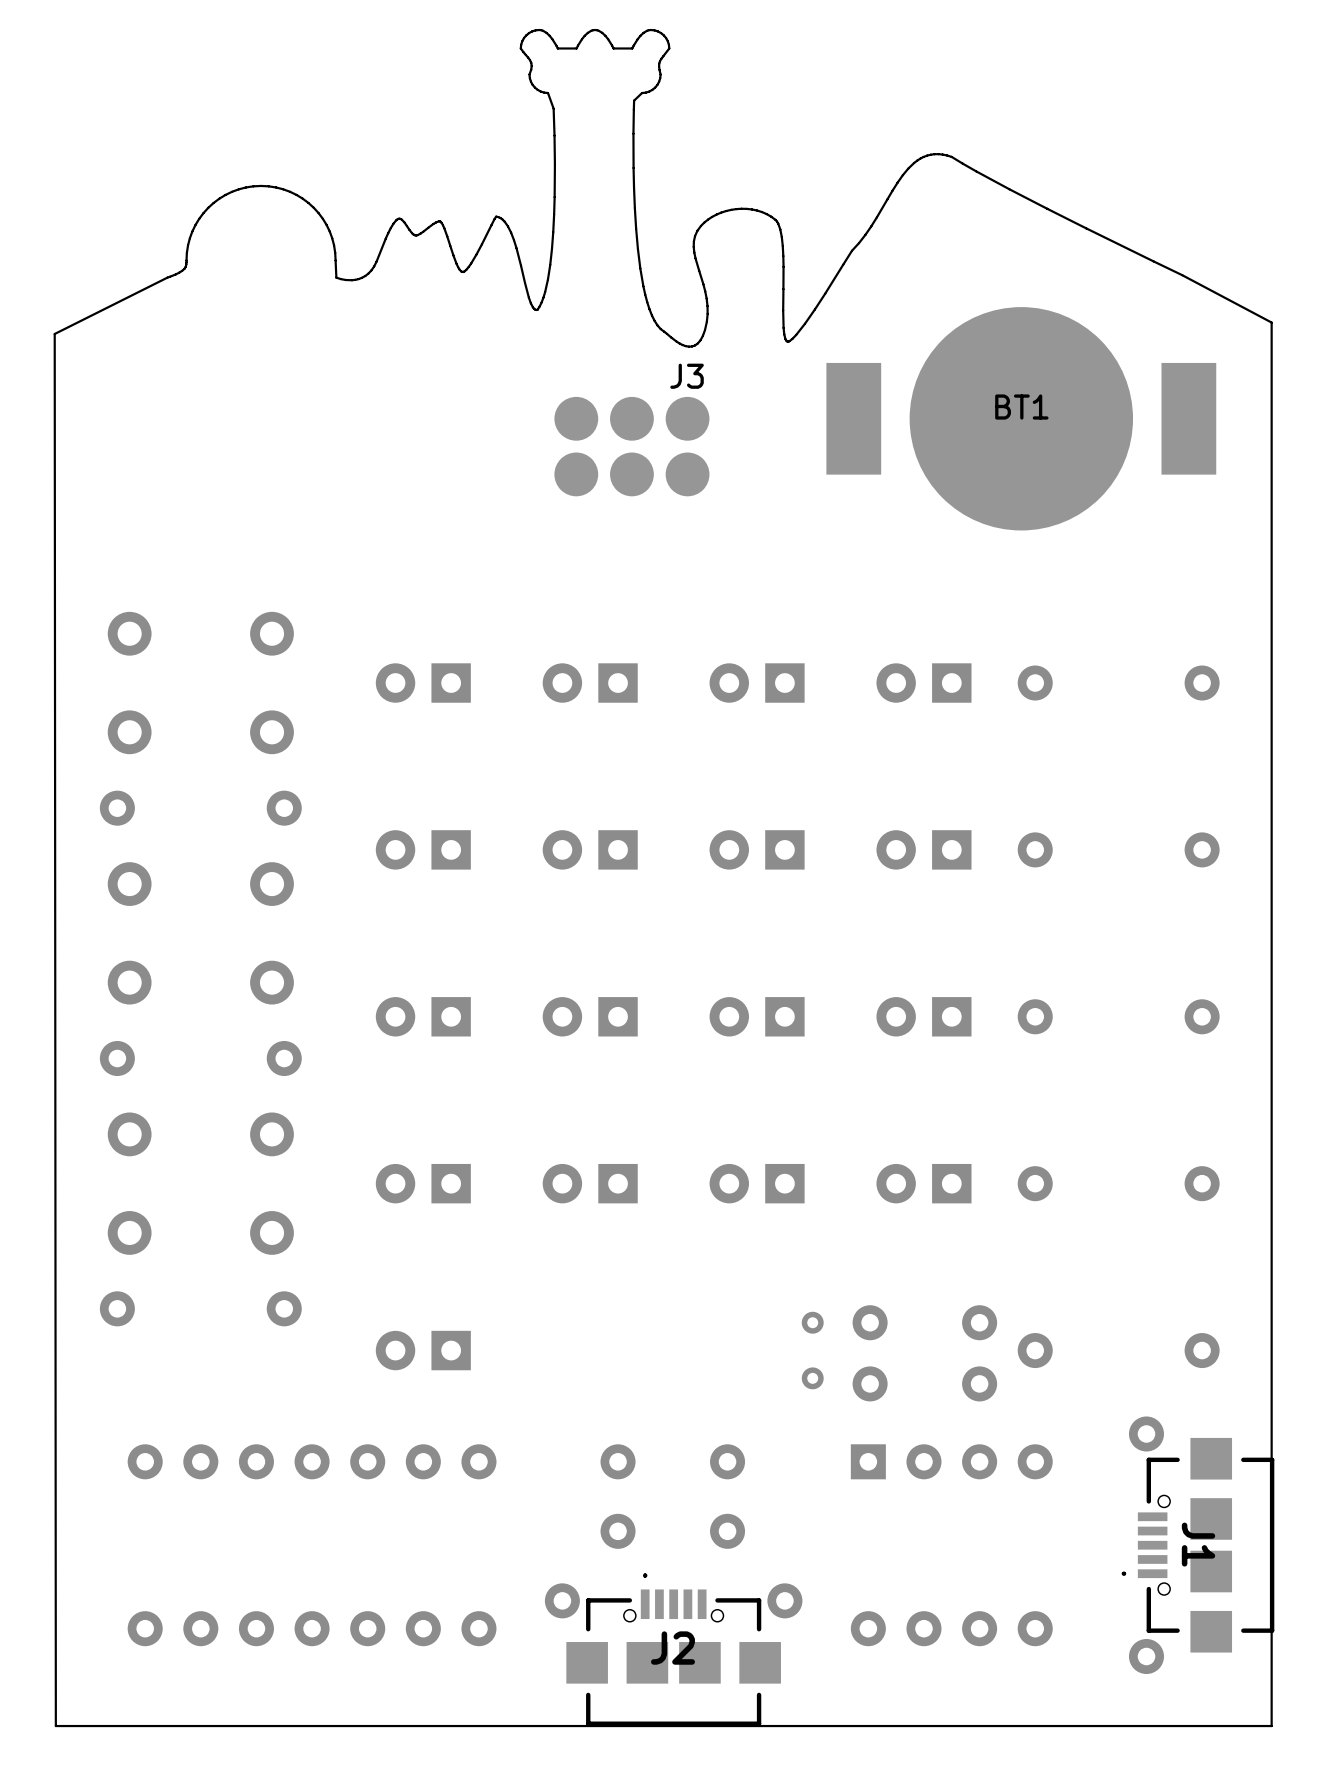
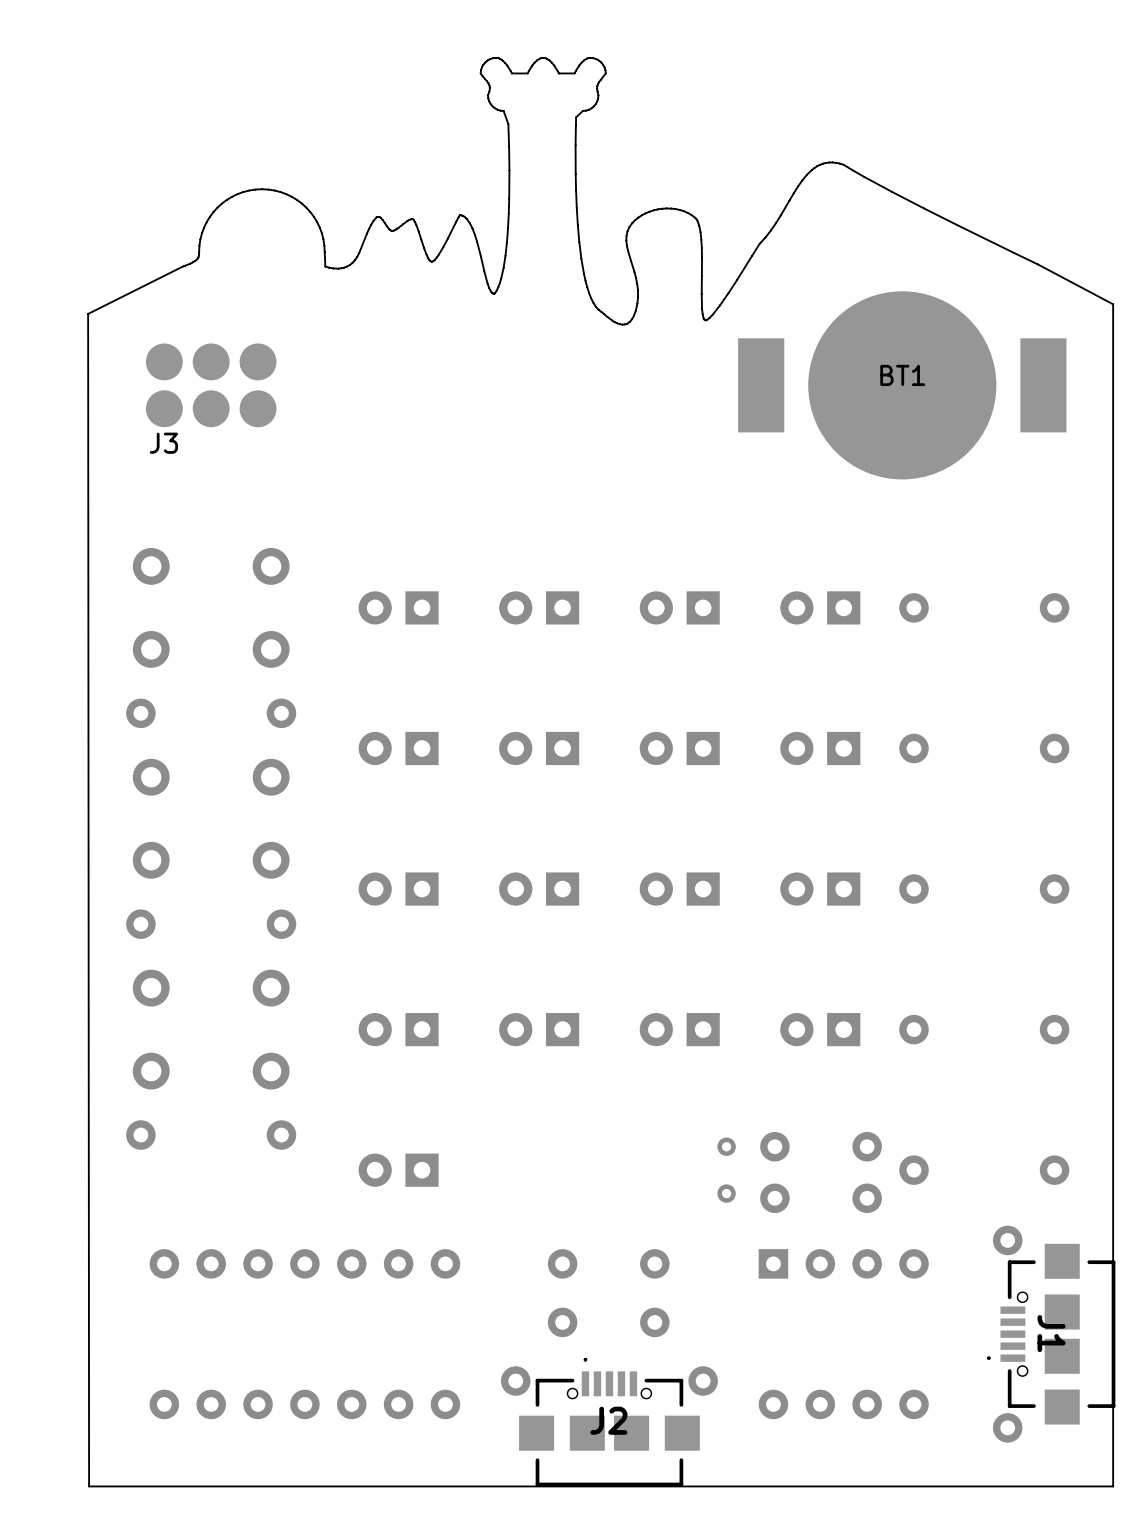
J3 name position: J3 (687, 376) -> J3 (163, 443)
J3 position: (631, 446) -> (211, 385)

